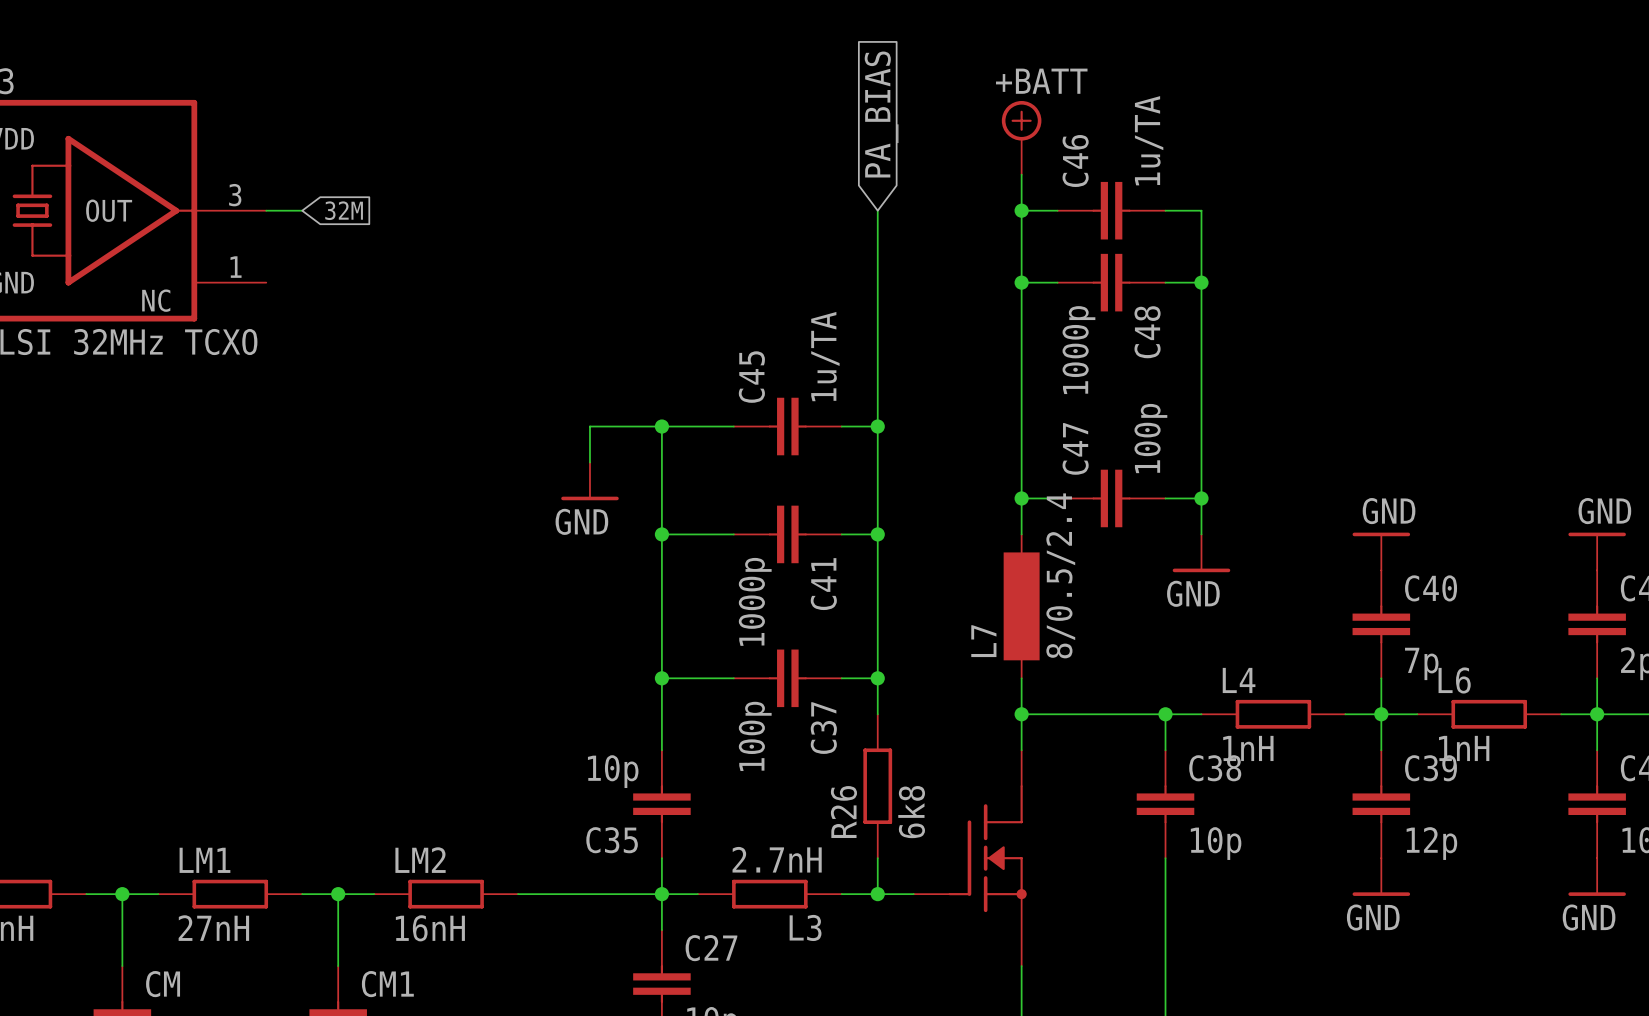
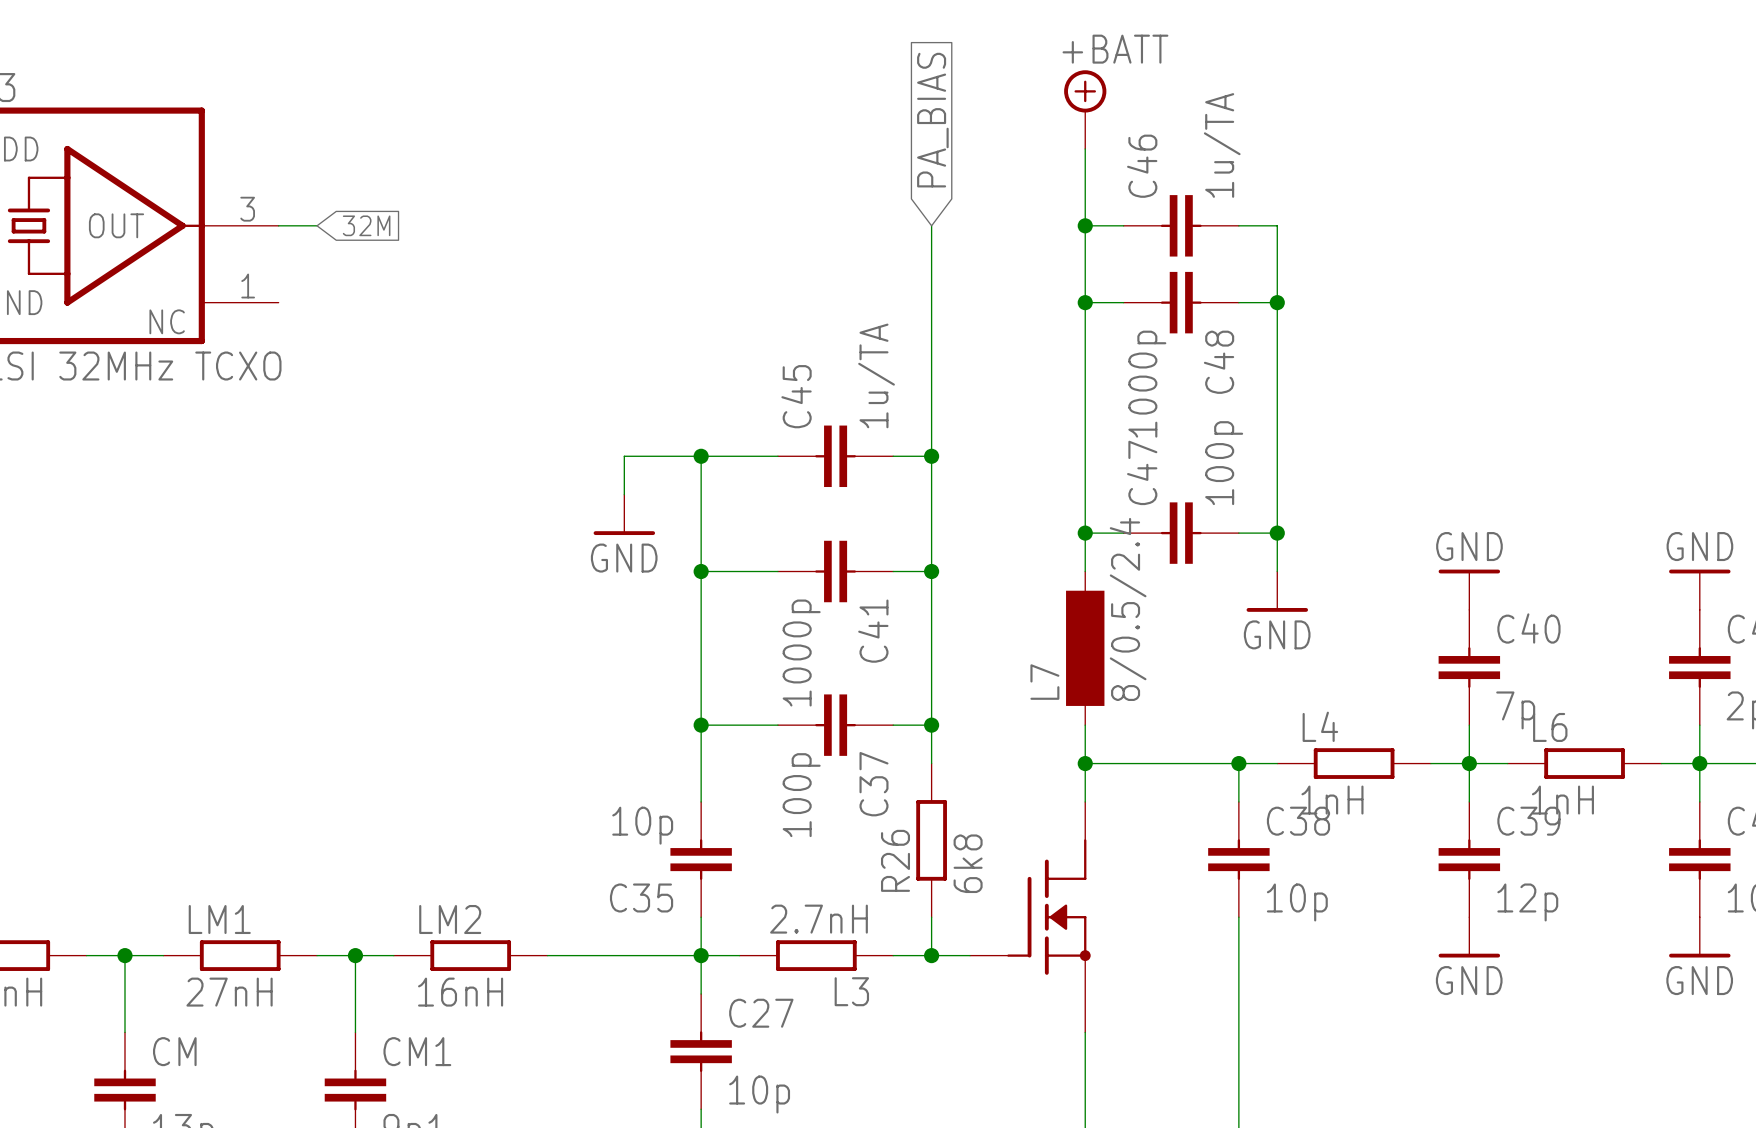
power symbol position: +BATT (1021, 137) -> +BATT (1085, 109)

